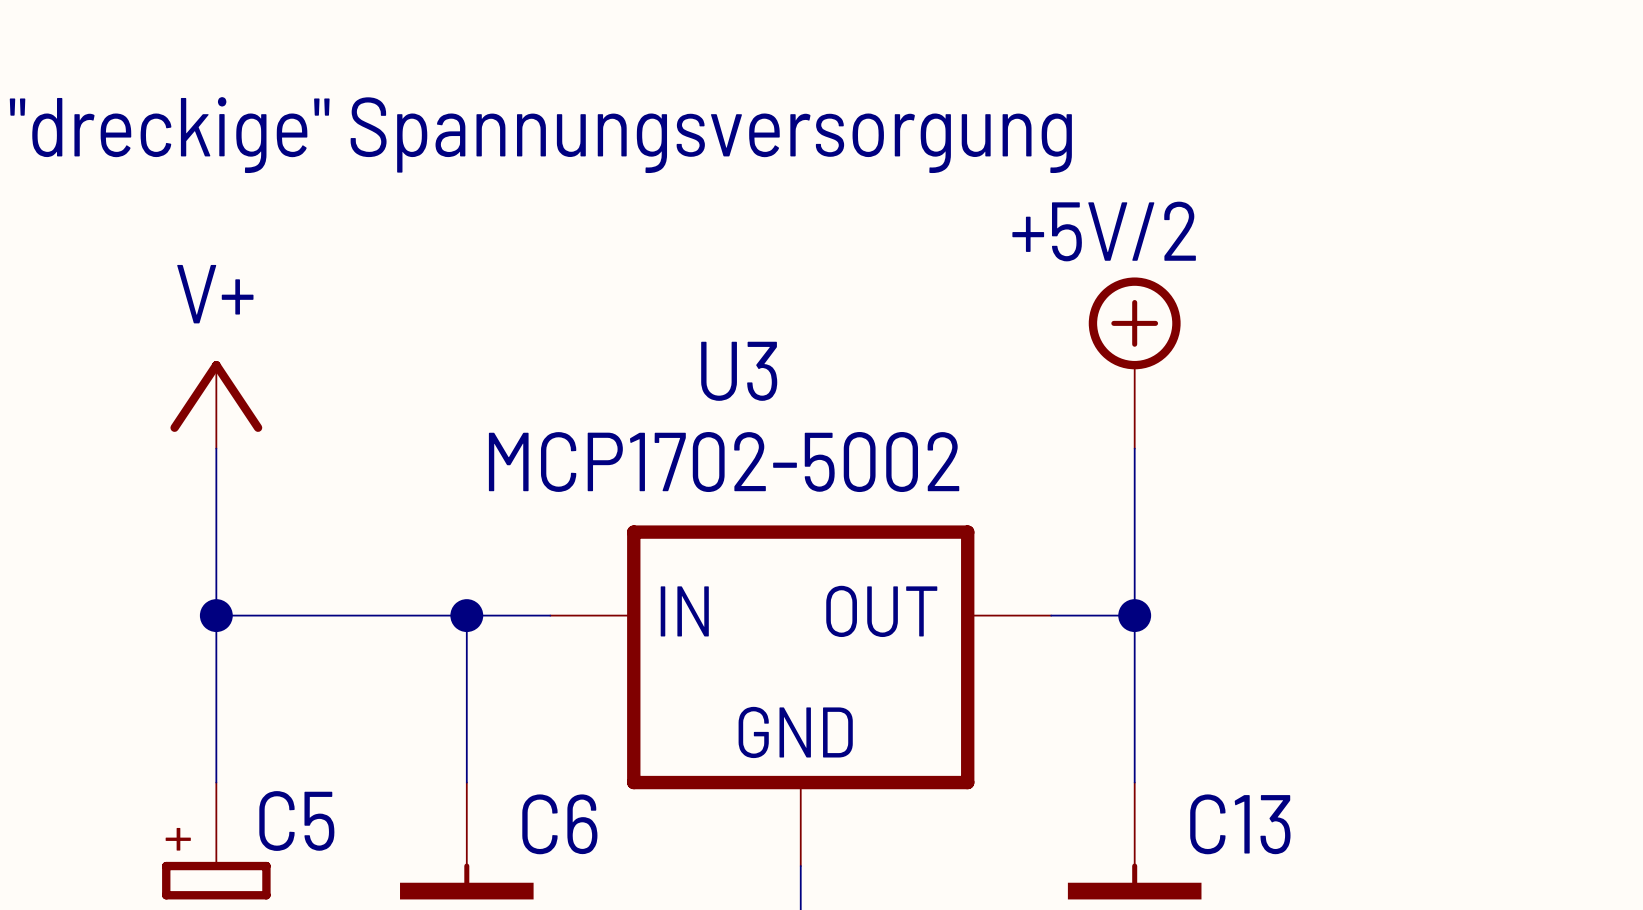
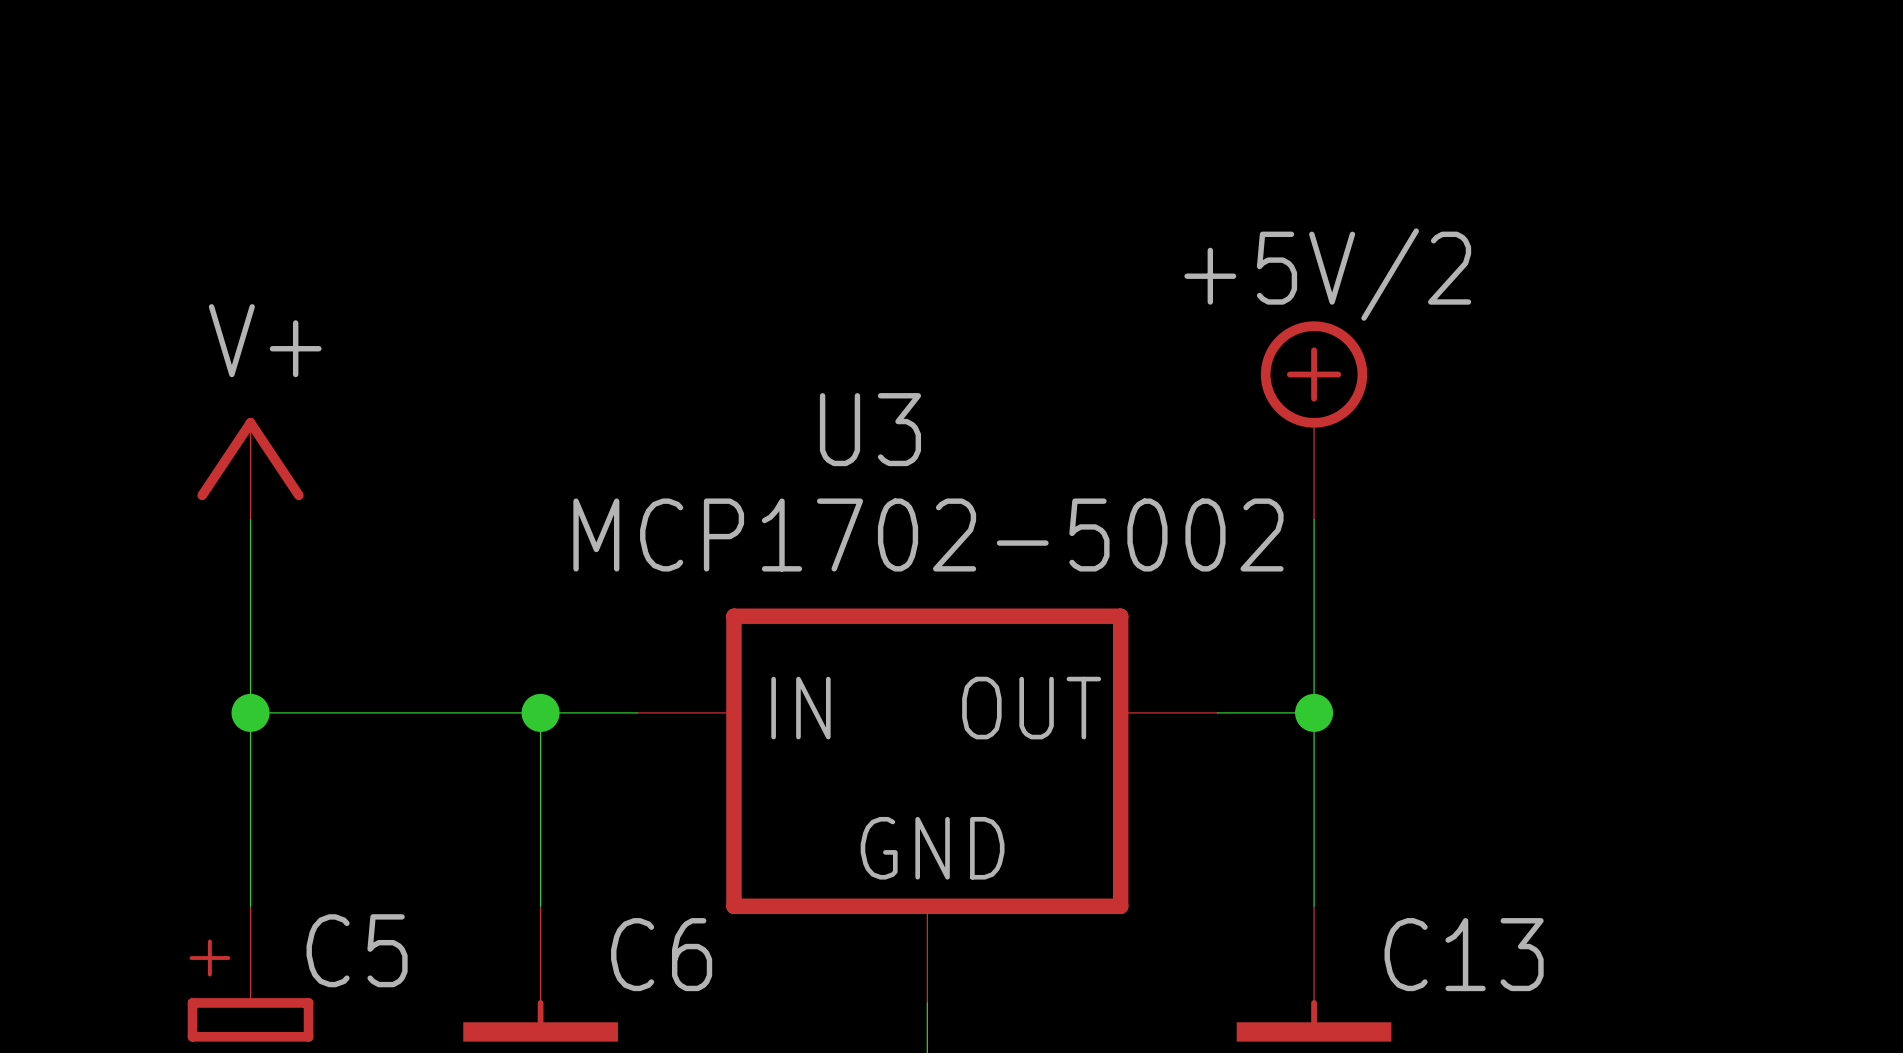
text: "dreckige" Spannungsversorgung (540, 135) -> none

